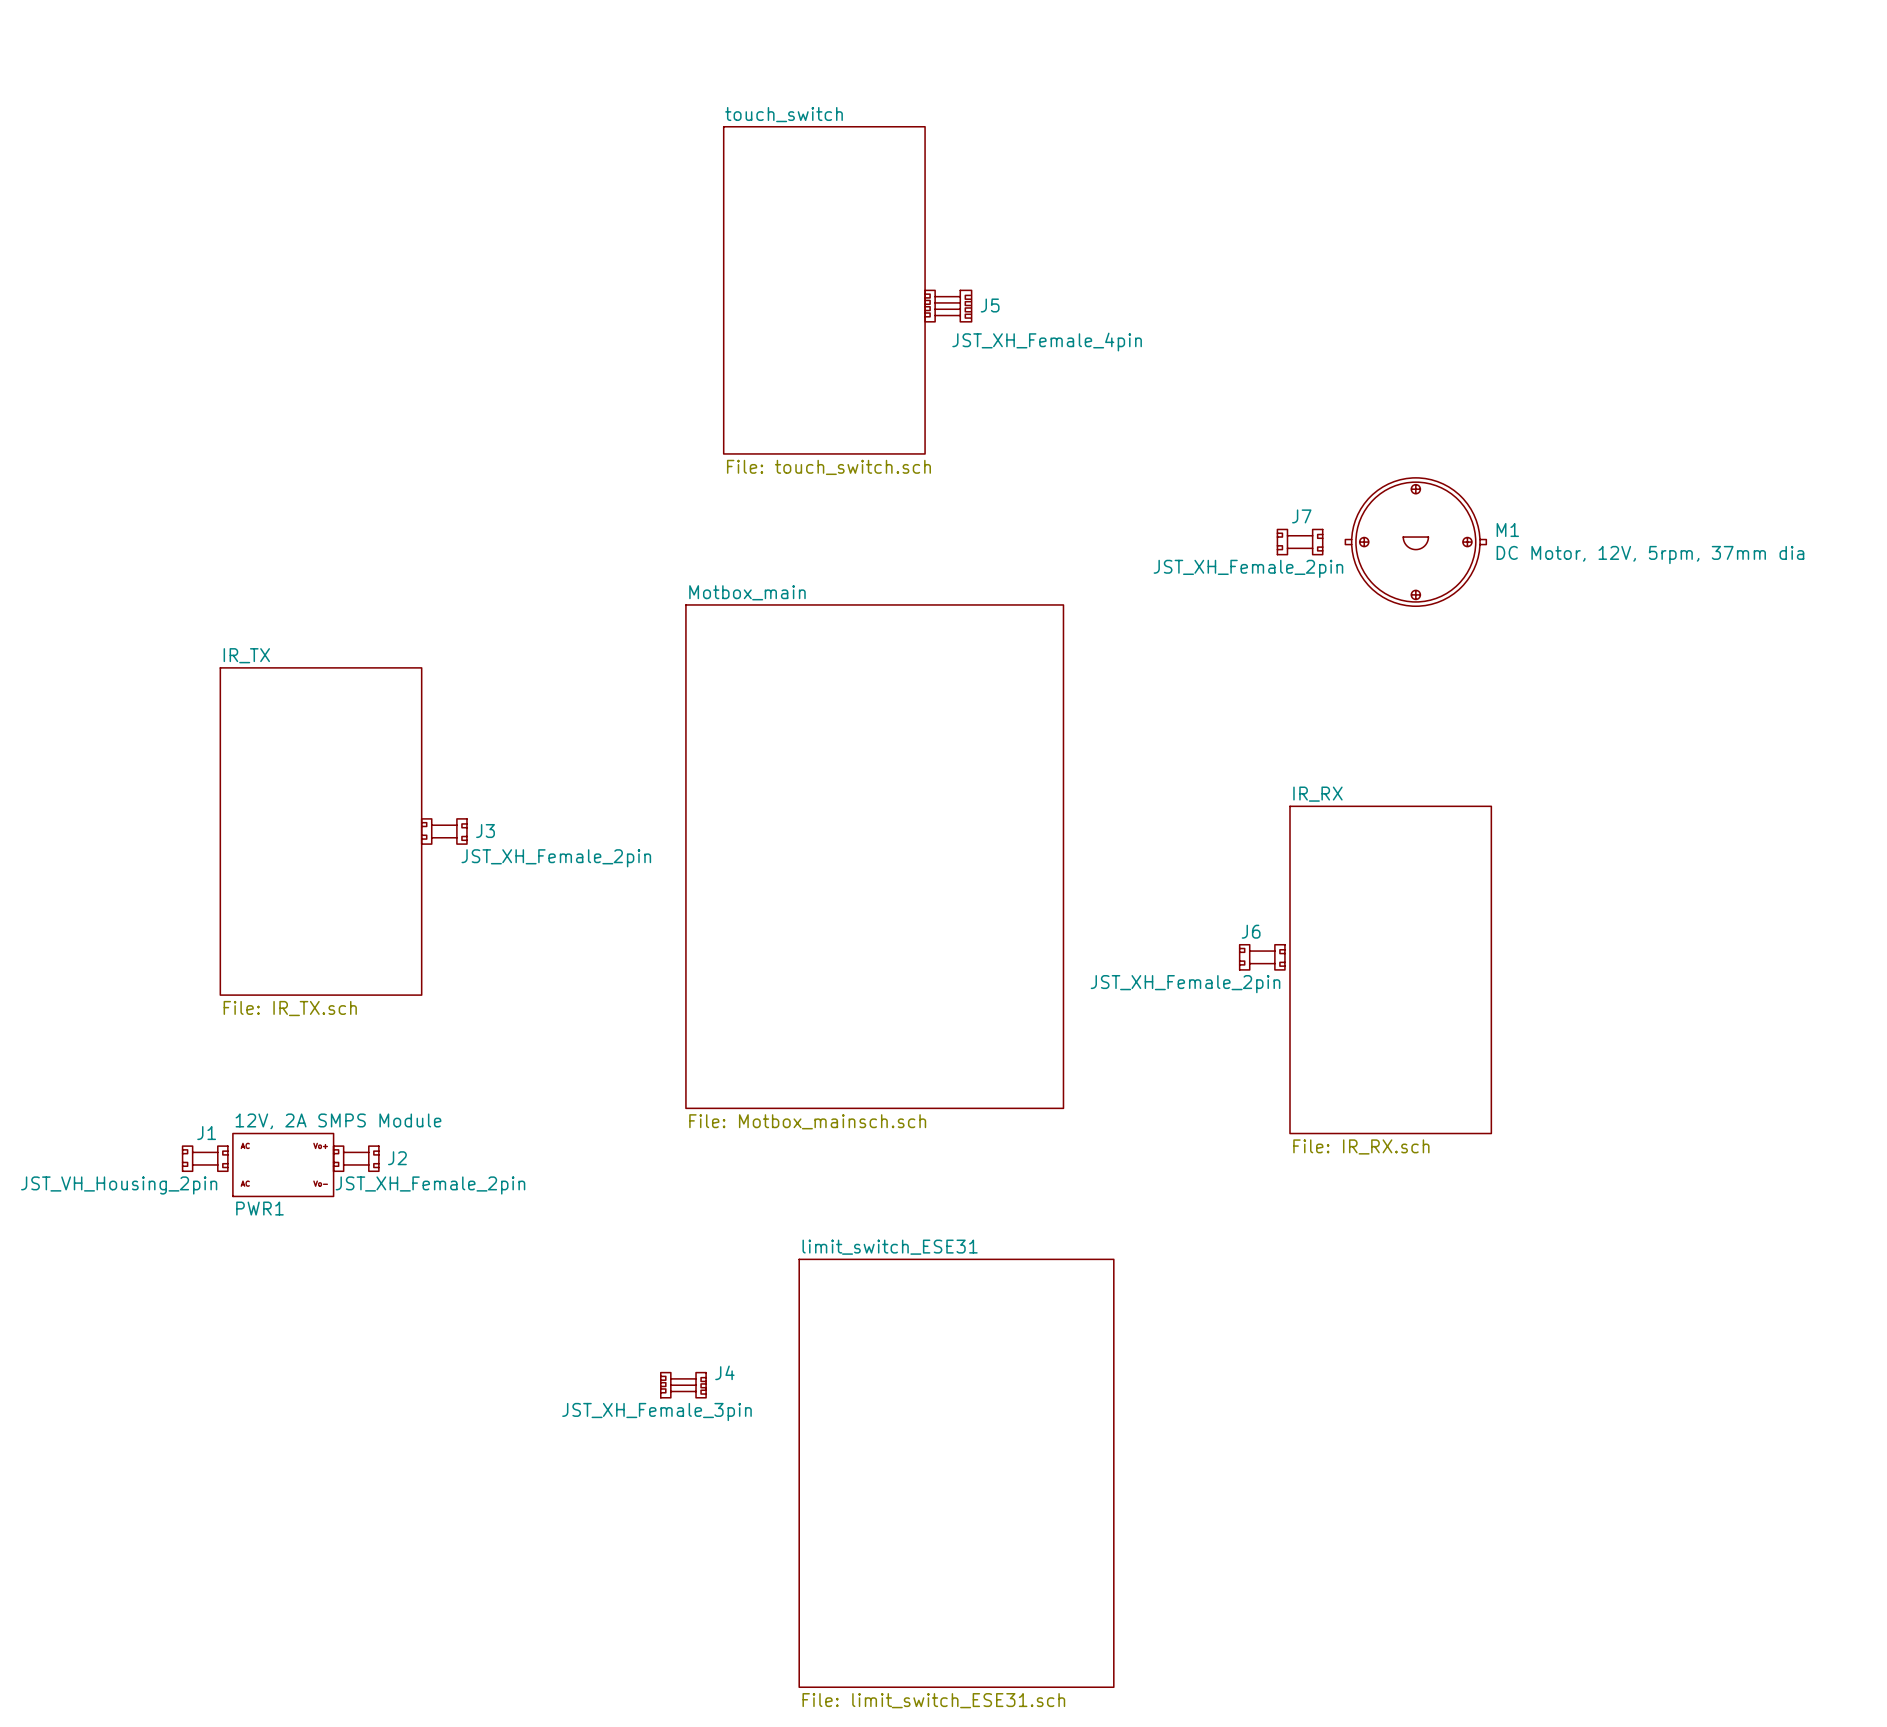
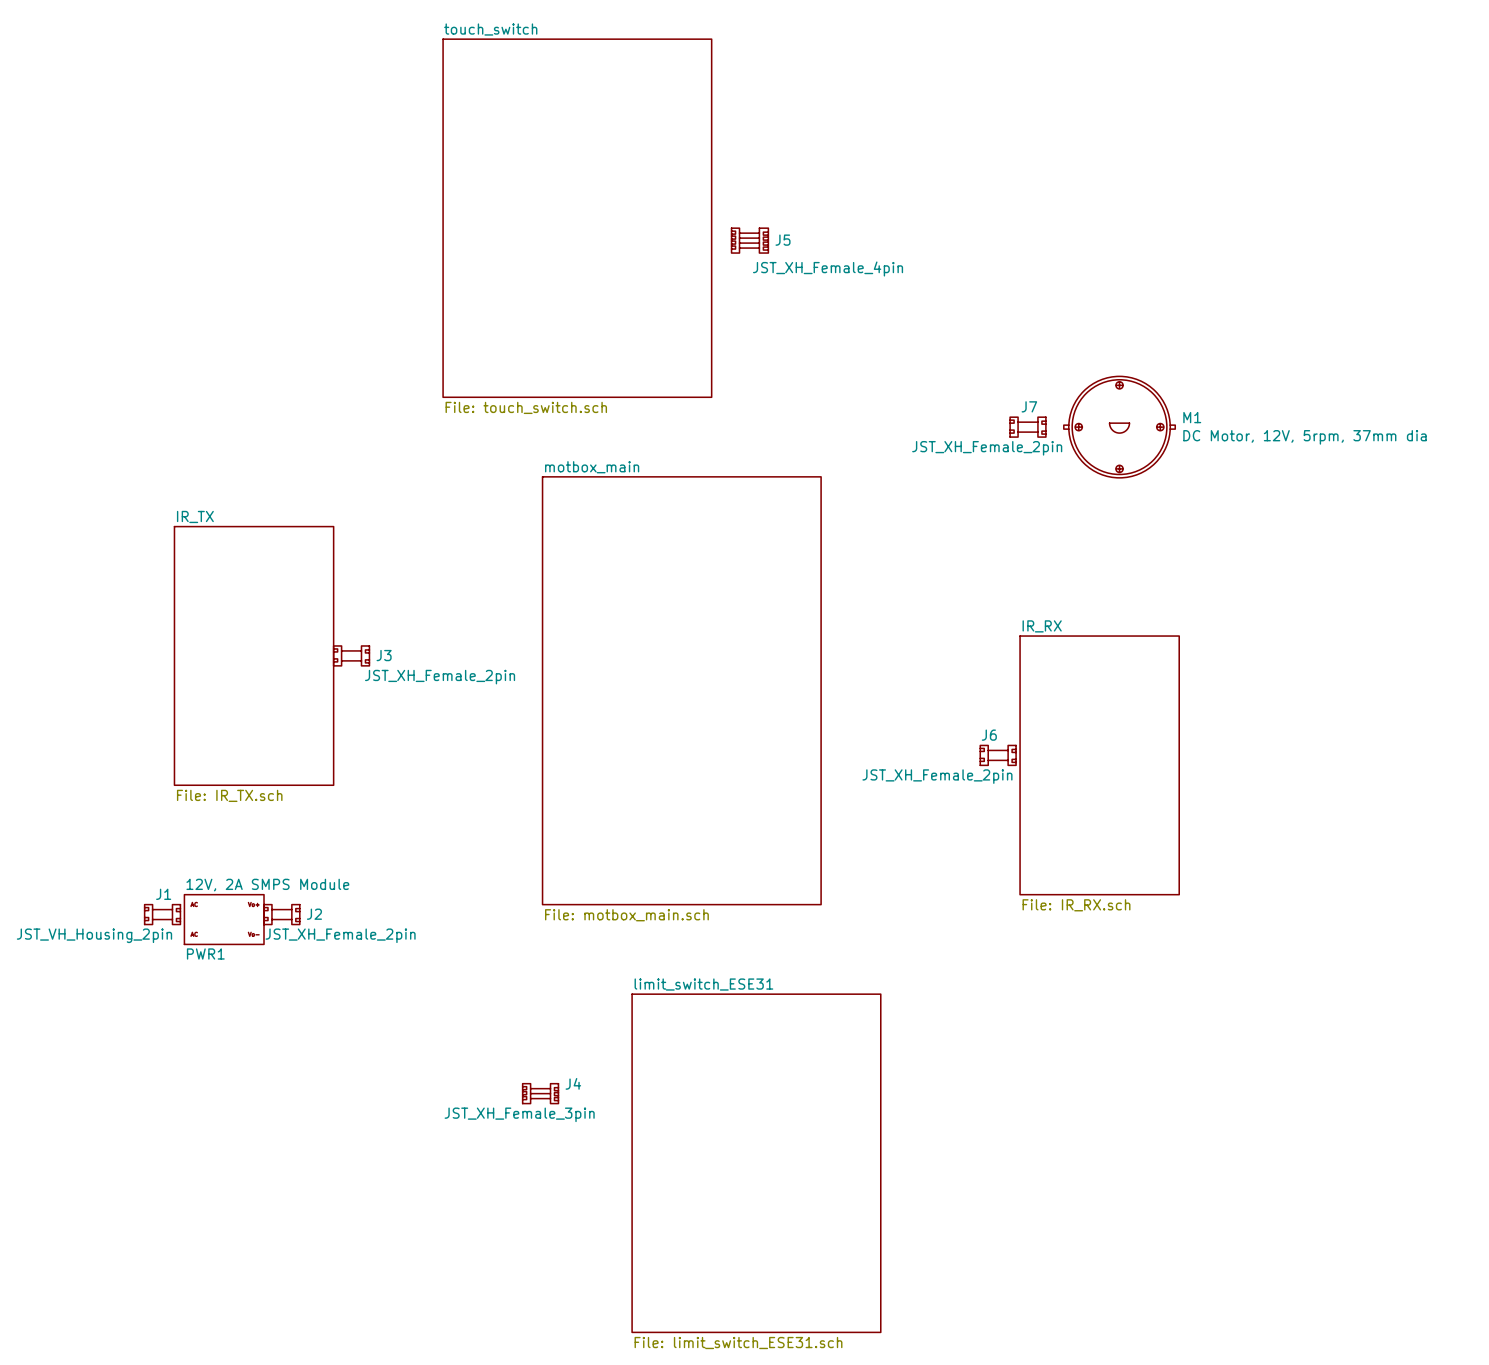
sheet touch_switch: none -> File: touch_switch.sch (577, 218)
sheet touch_switch: File: touch_switch.sch (824, 290) -> none
sheet Motbox_main: File: Motbox_mainsch.sch (874, 856) -> none
sheet motbox_main: none -> File: motbox_main.sch (681, 690)

